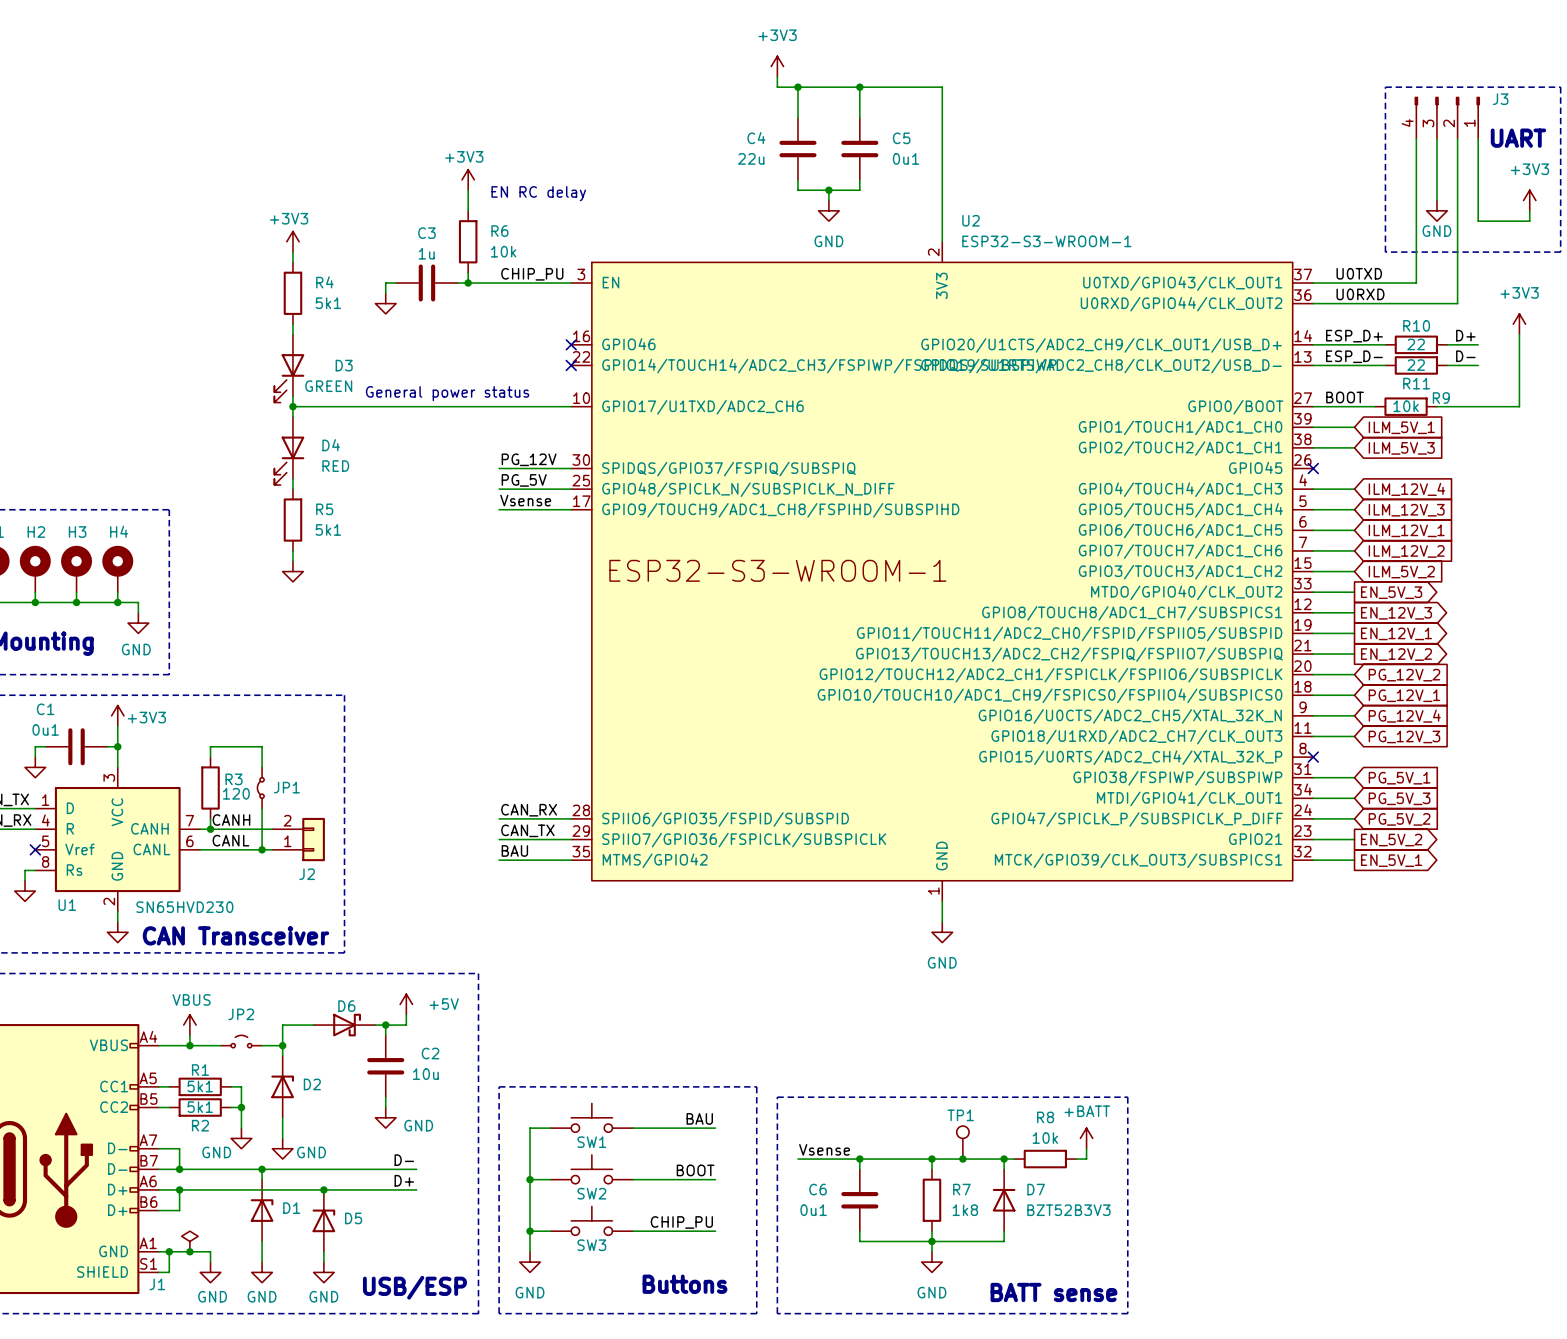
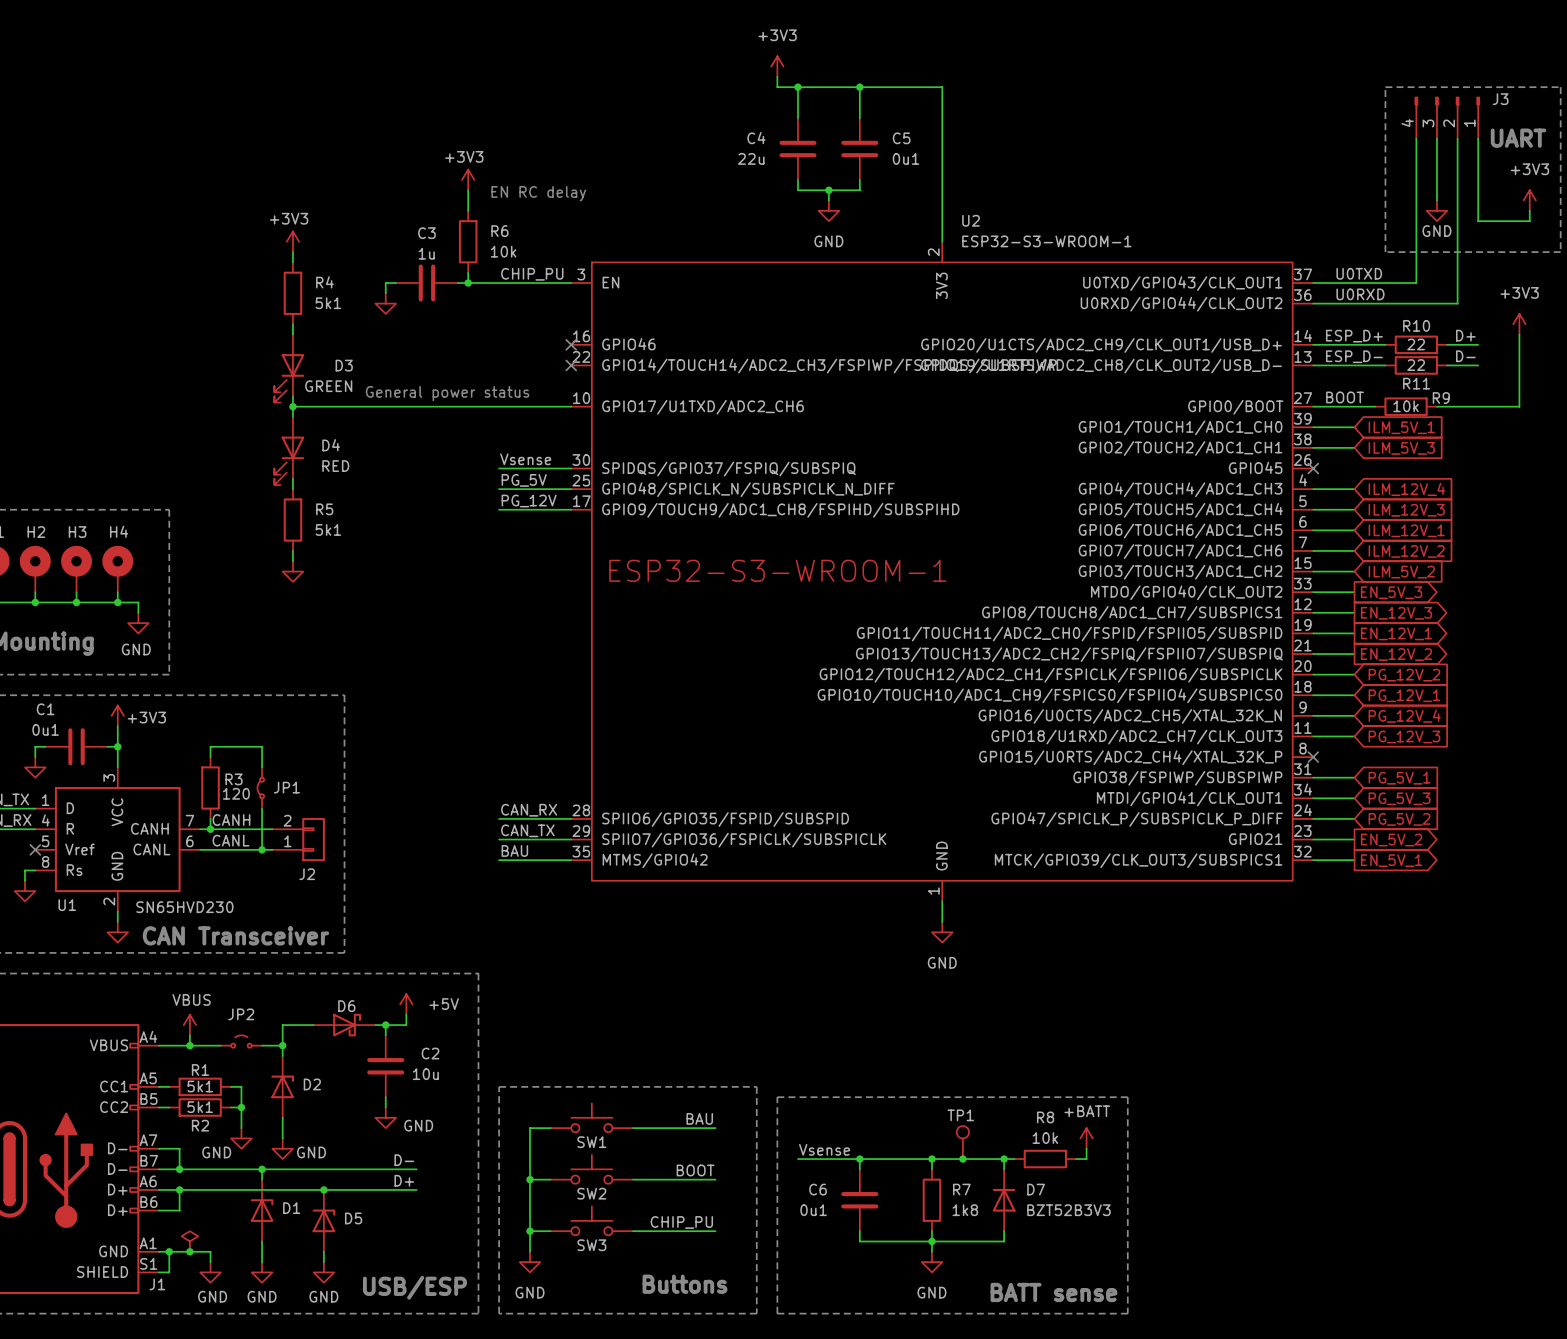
label: PG_12V (529, 459) -> Vsense (525, 459)
label: Vsense (525, 500) -> PG_12V (529, 501)

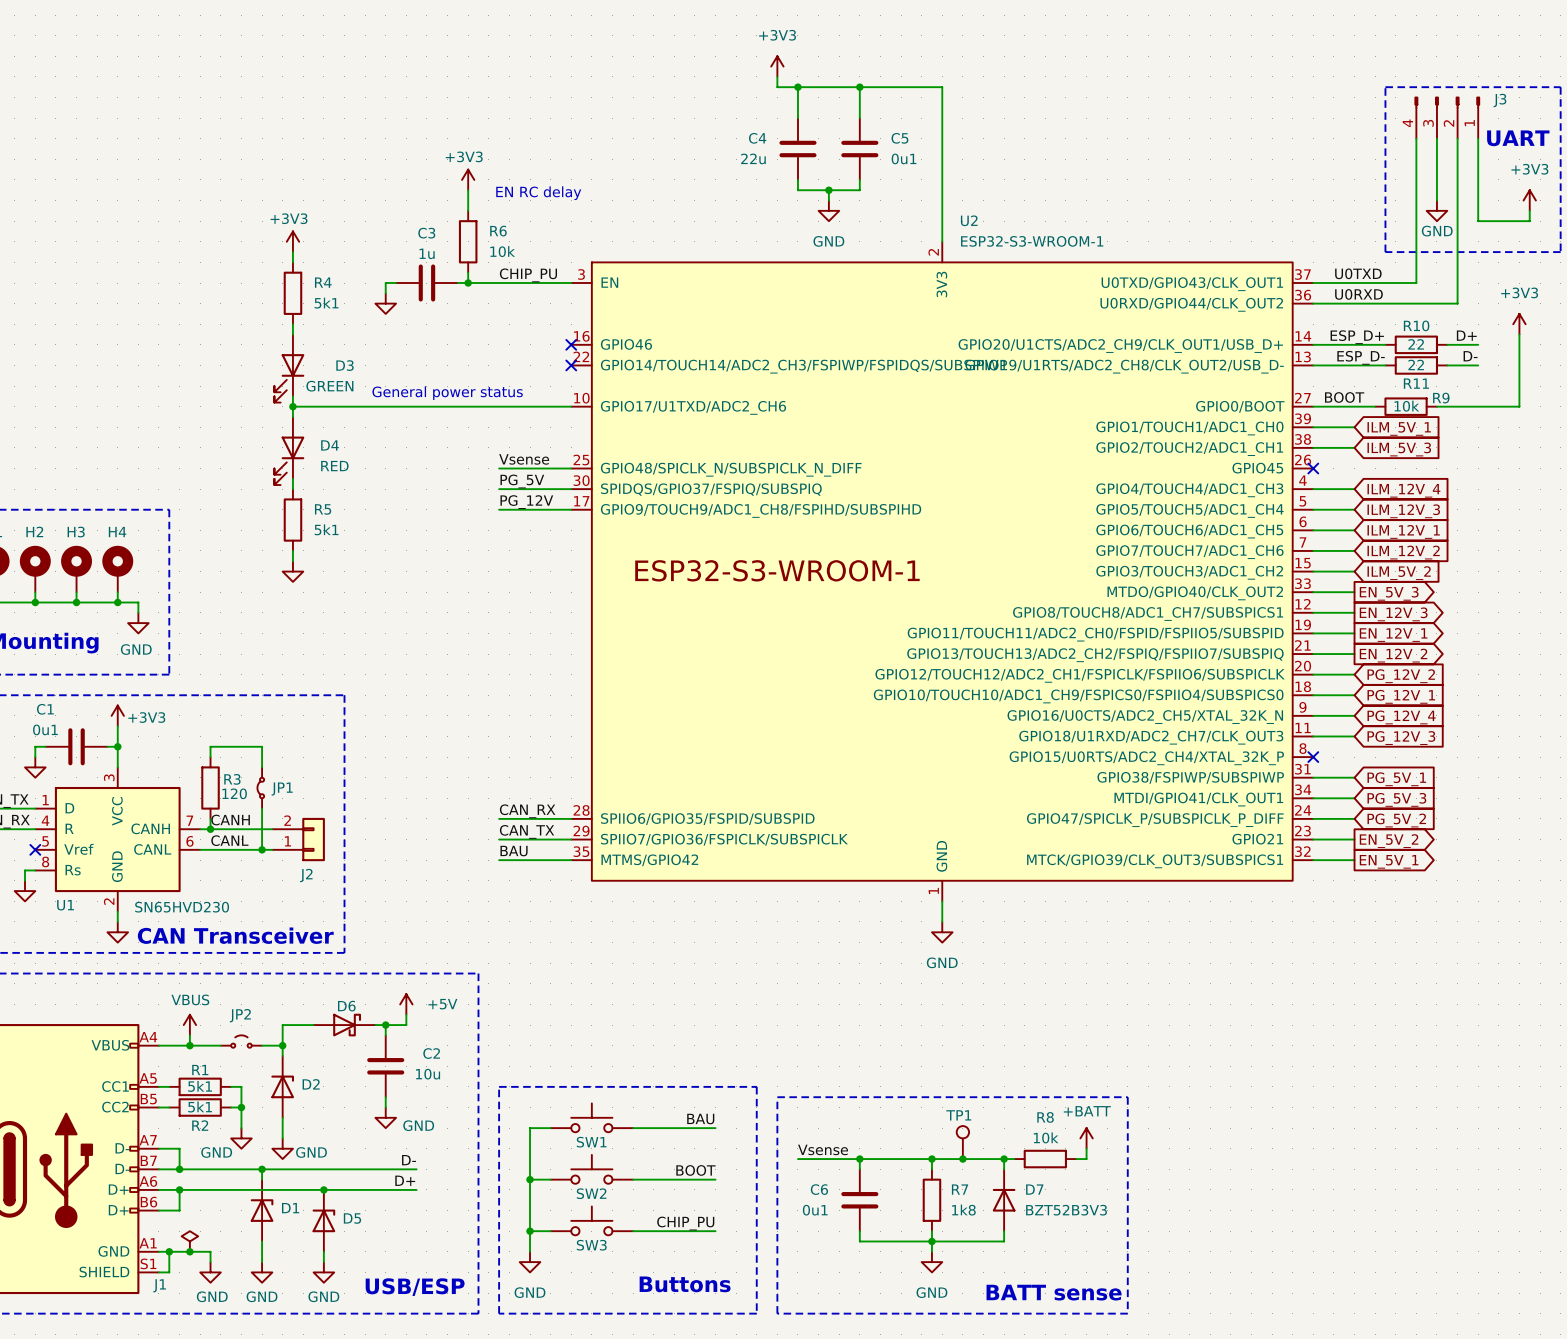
U2 pin number: 30 (581, 460) -> 25 (581, 460)
U2 pin name: SPIDQS/GPIO37/FSPIQ/SUBSPIQ (729, 469) -> GPIO48/SPICLK_N/SUBSPICLK_N_DIFF (731, 469)
U2 pin number: 25 (581, 480) -> 30 (581, 480)
U2 pin name: GPIO48/SPICLK_N/SUBSPICLK_N_DIFF (748, 489) -> SPIDQS/GPIO37/FSPIQ/SUBSPIQ (711, 489)

